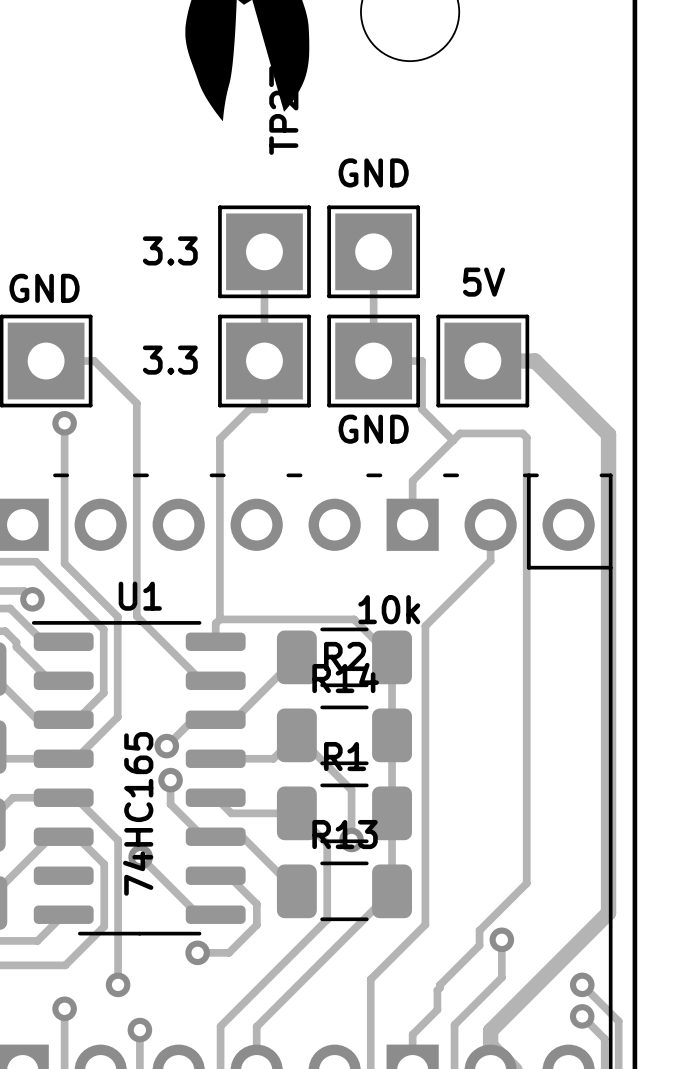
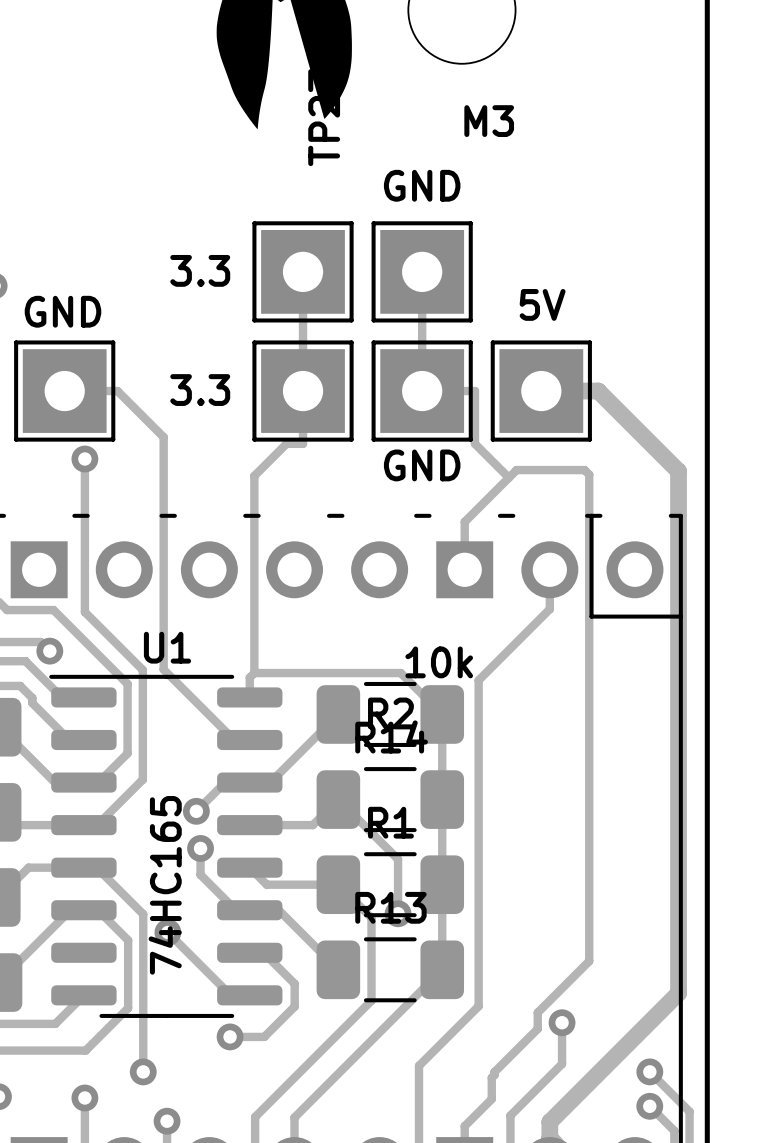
part value: none -> M3 (489, 121)

